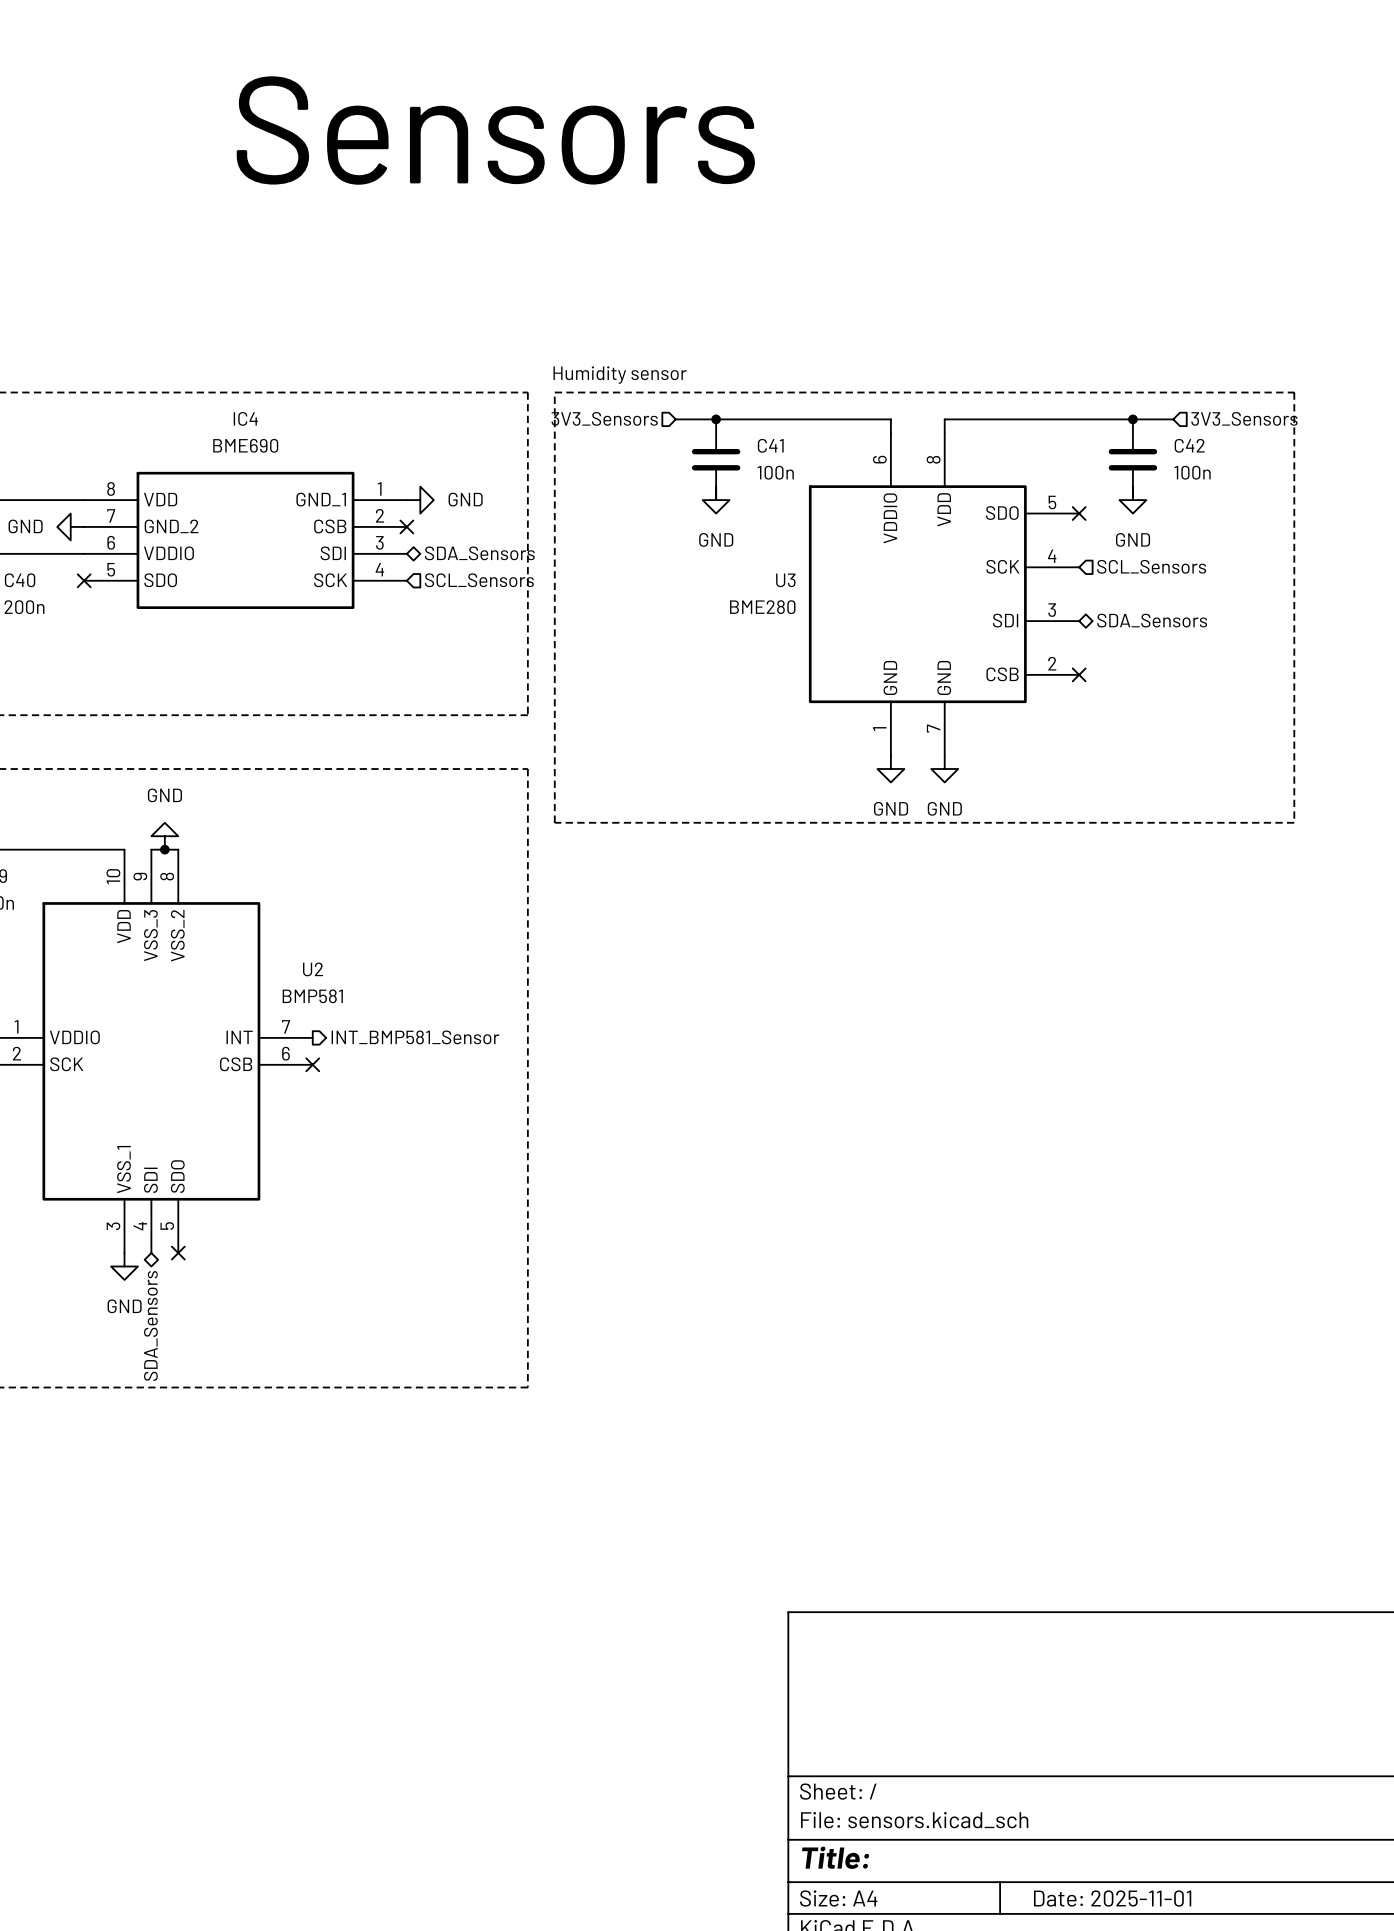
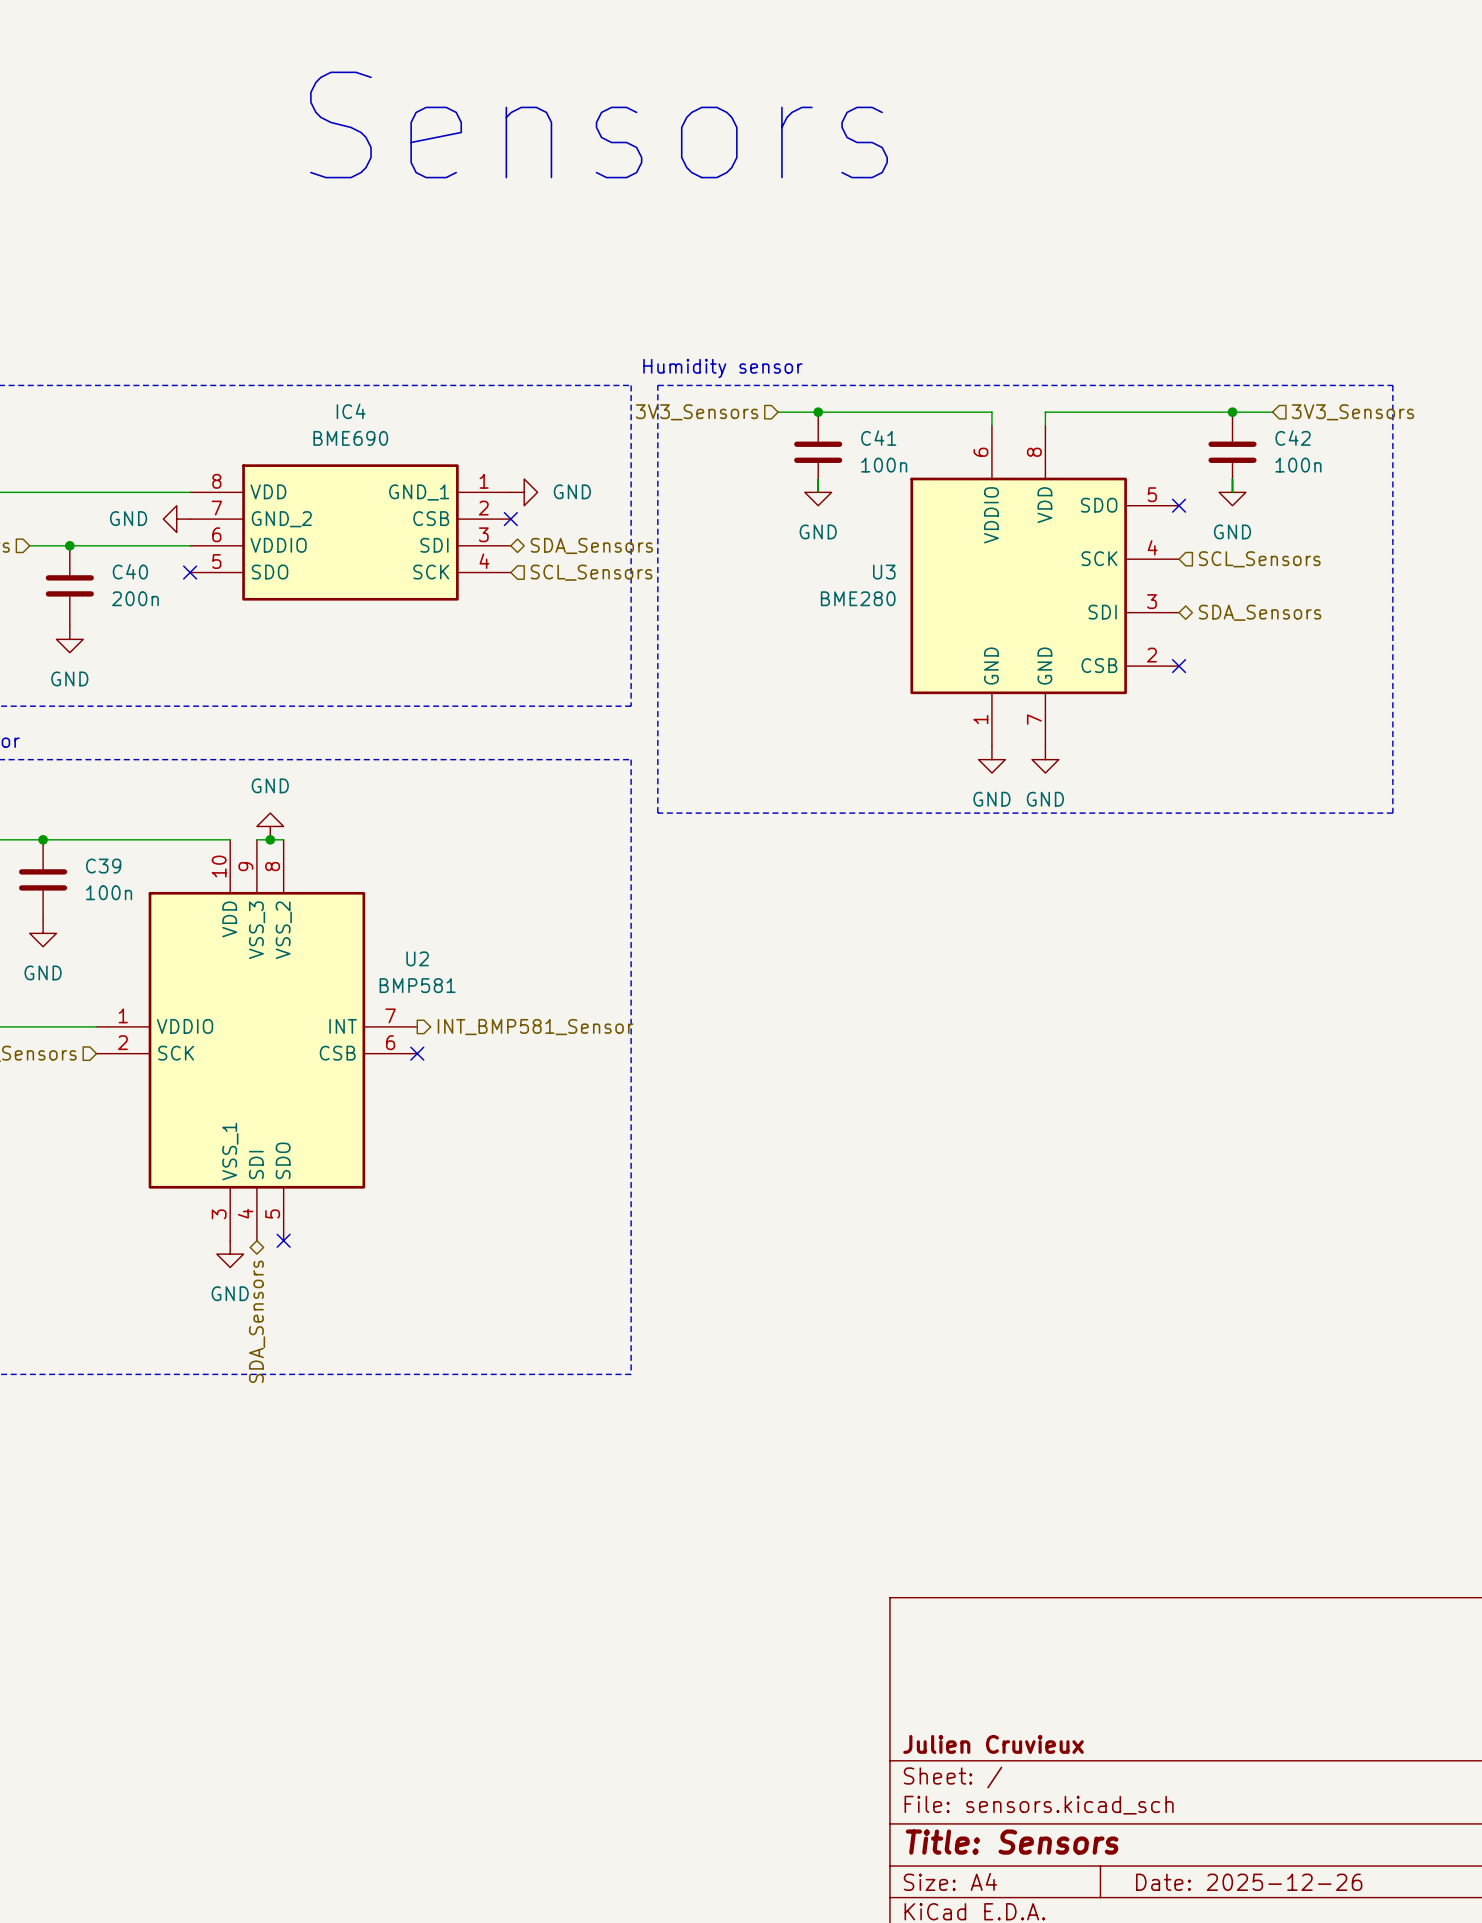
title block: none -> Julien Cruvieux (993, 1744)
title block: Title: (835, 1857) -> Title: Sensors (1012, 1842)
title block: Date: 2025-11-01 (1112, 1898) -> Date: 2025-12-26 (1249, 1882)

